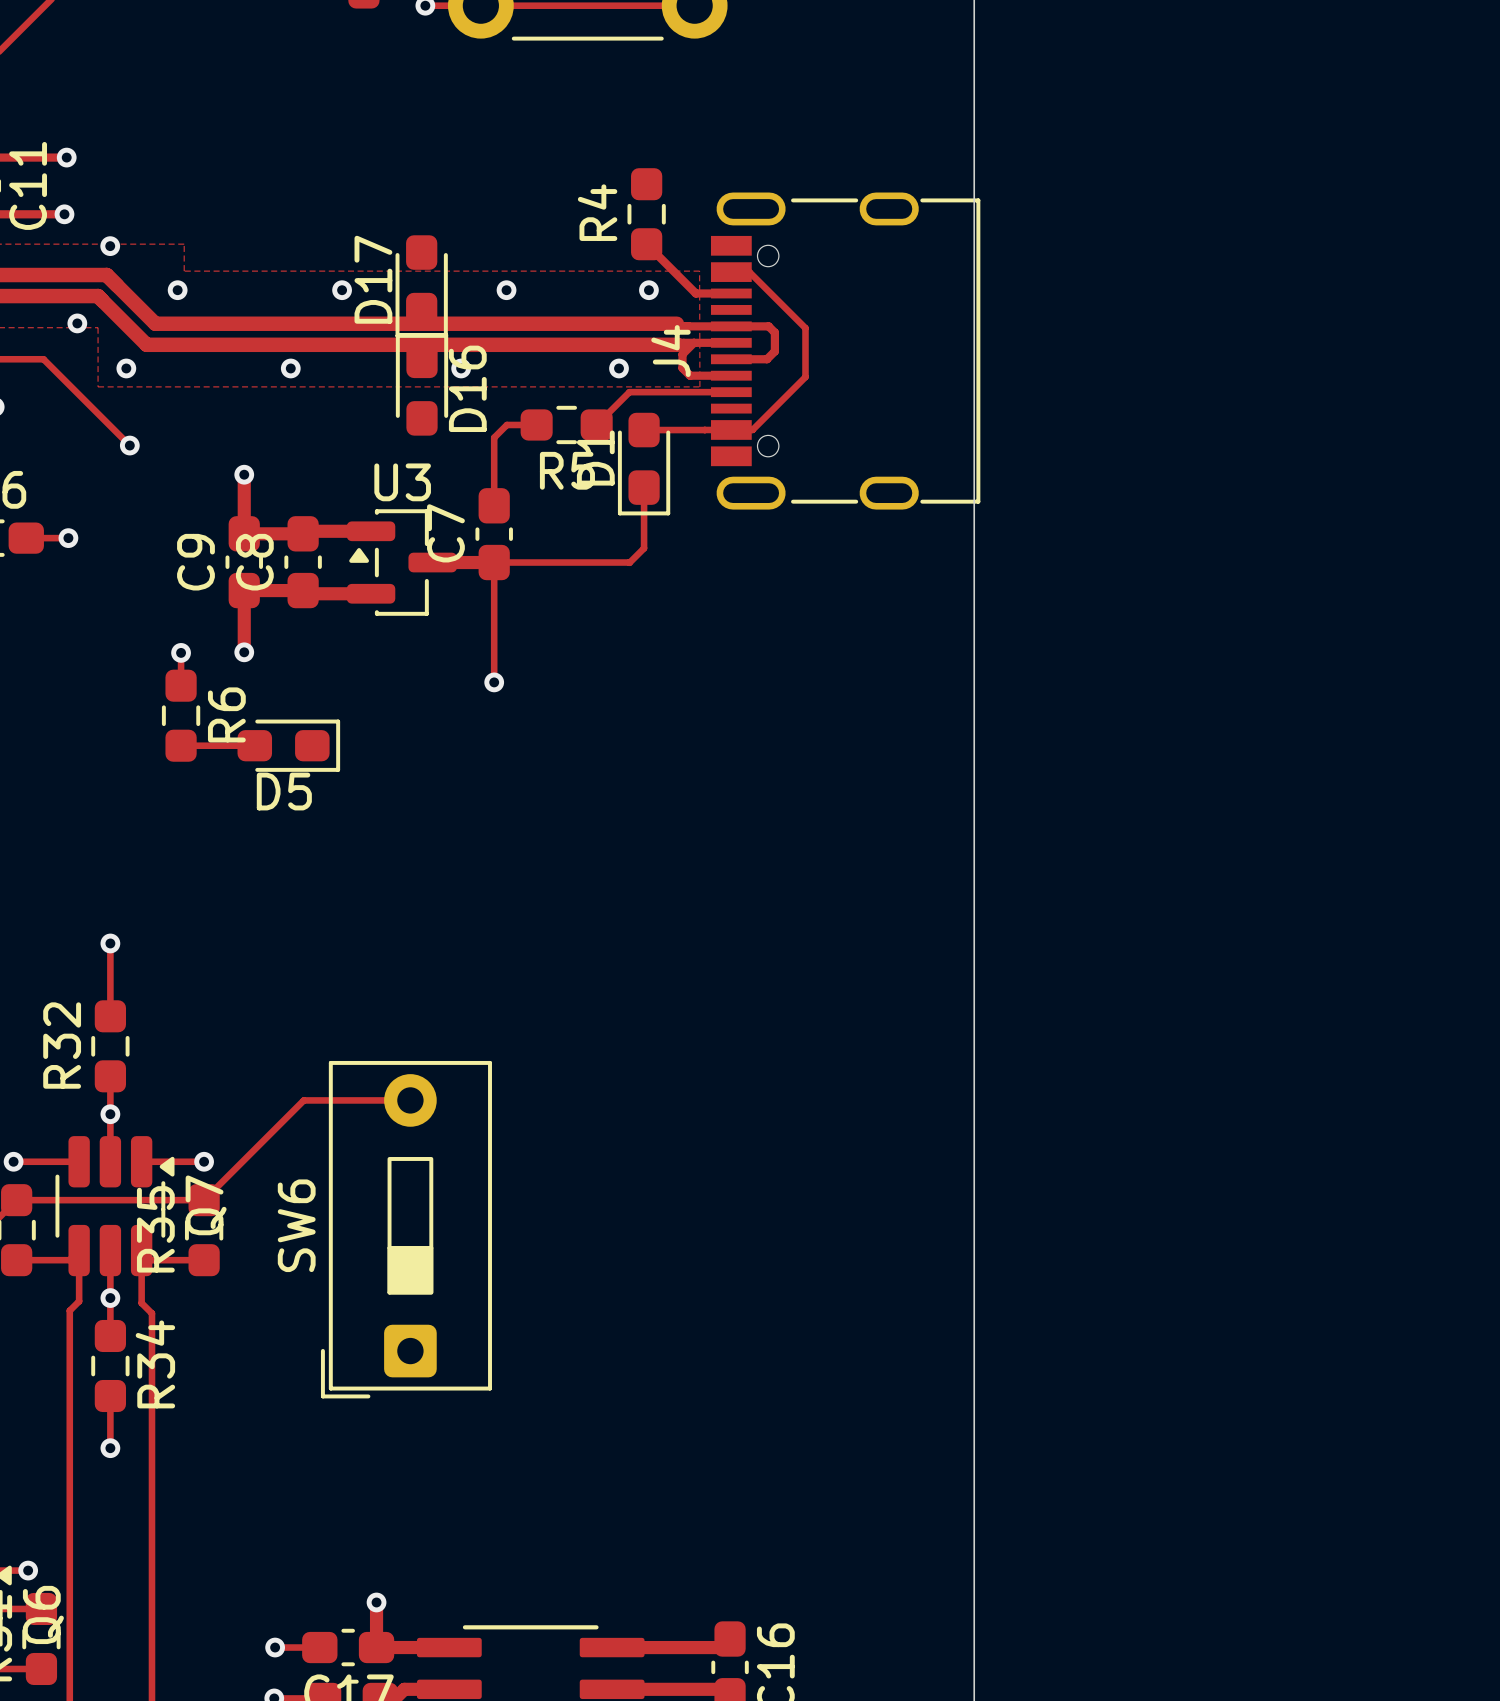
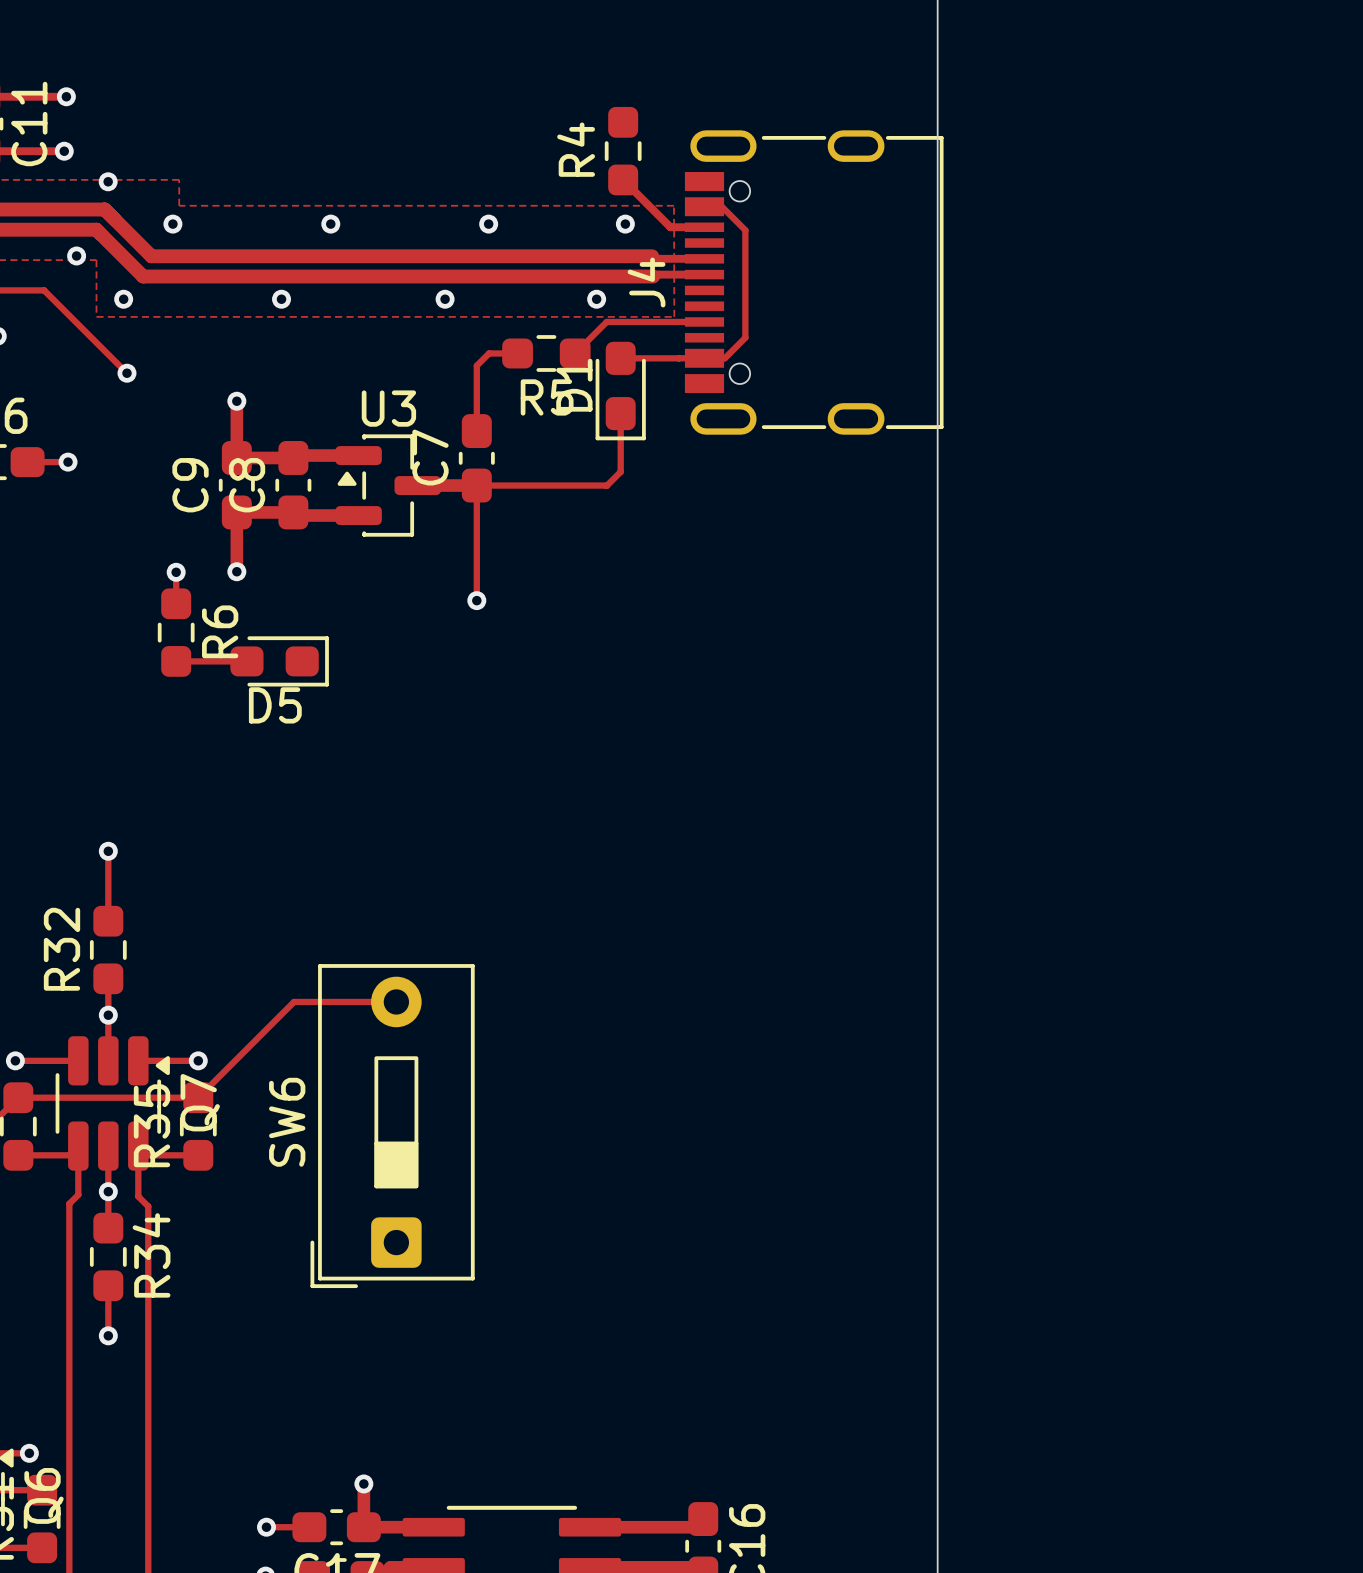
D17: (421, 286) -> none
track: (773, 296) (805, 328) (805, 377) (773, 408) -> (745, 230) (745, 337)
track: (731, 326) (768, 326) (774, 332) (774, 351) (767, 359) (731, 359) -> none
track: (694, 342) (682, 354) (682, 368) (690, 375) (731, 375) -> none
D16: (422, 384) -> none

